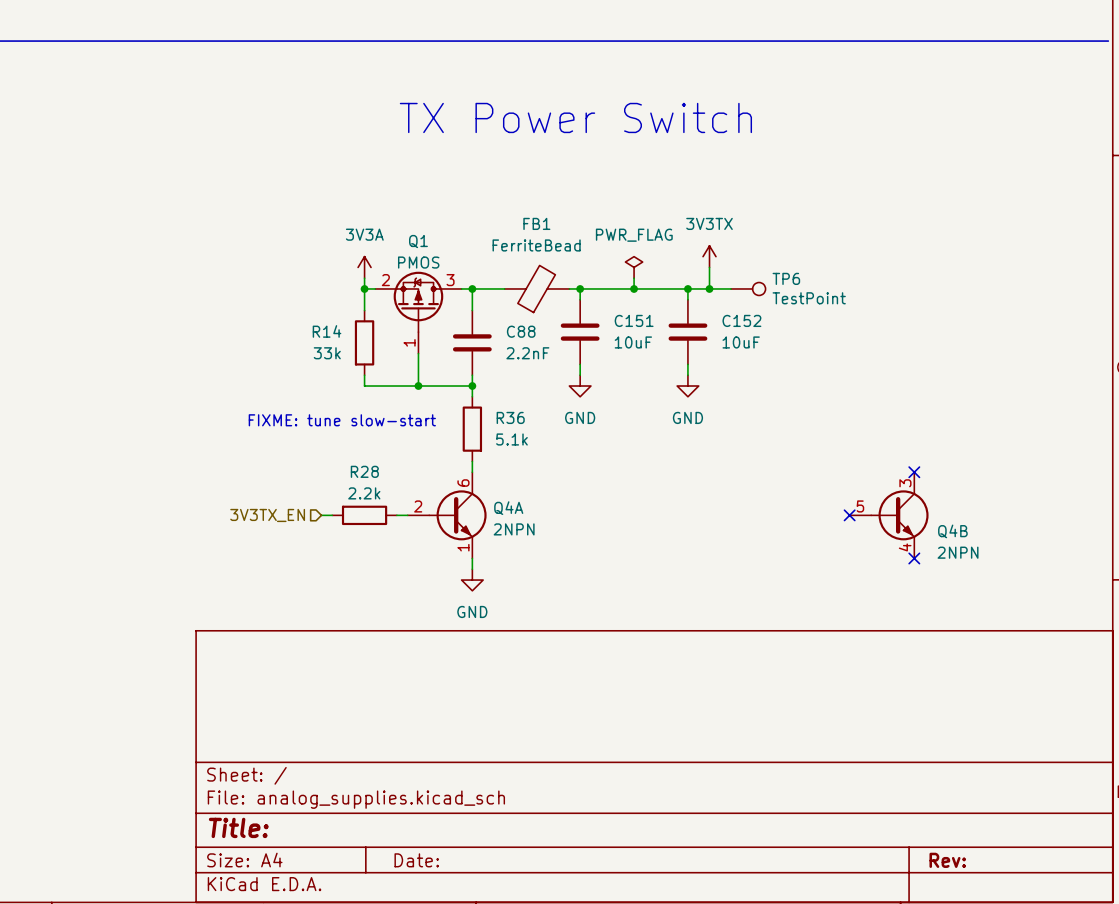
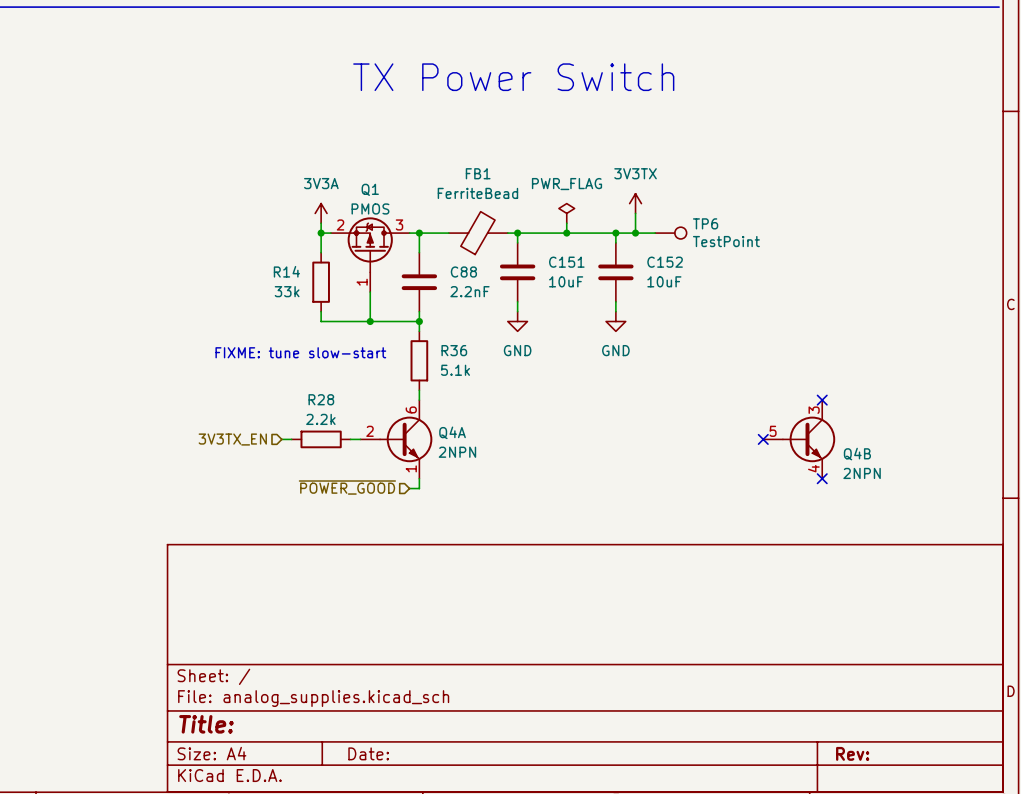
hierarchical label: none -> ~{POWER_GOOD} (347, 487)
wire: none -> (409, 488) (419, 488)
power symbol: GND (472, 580) -> none

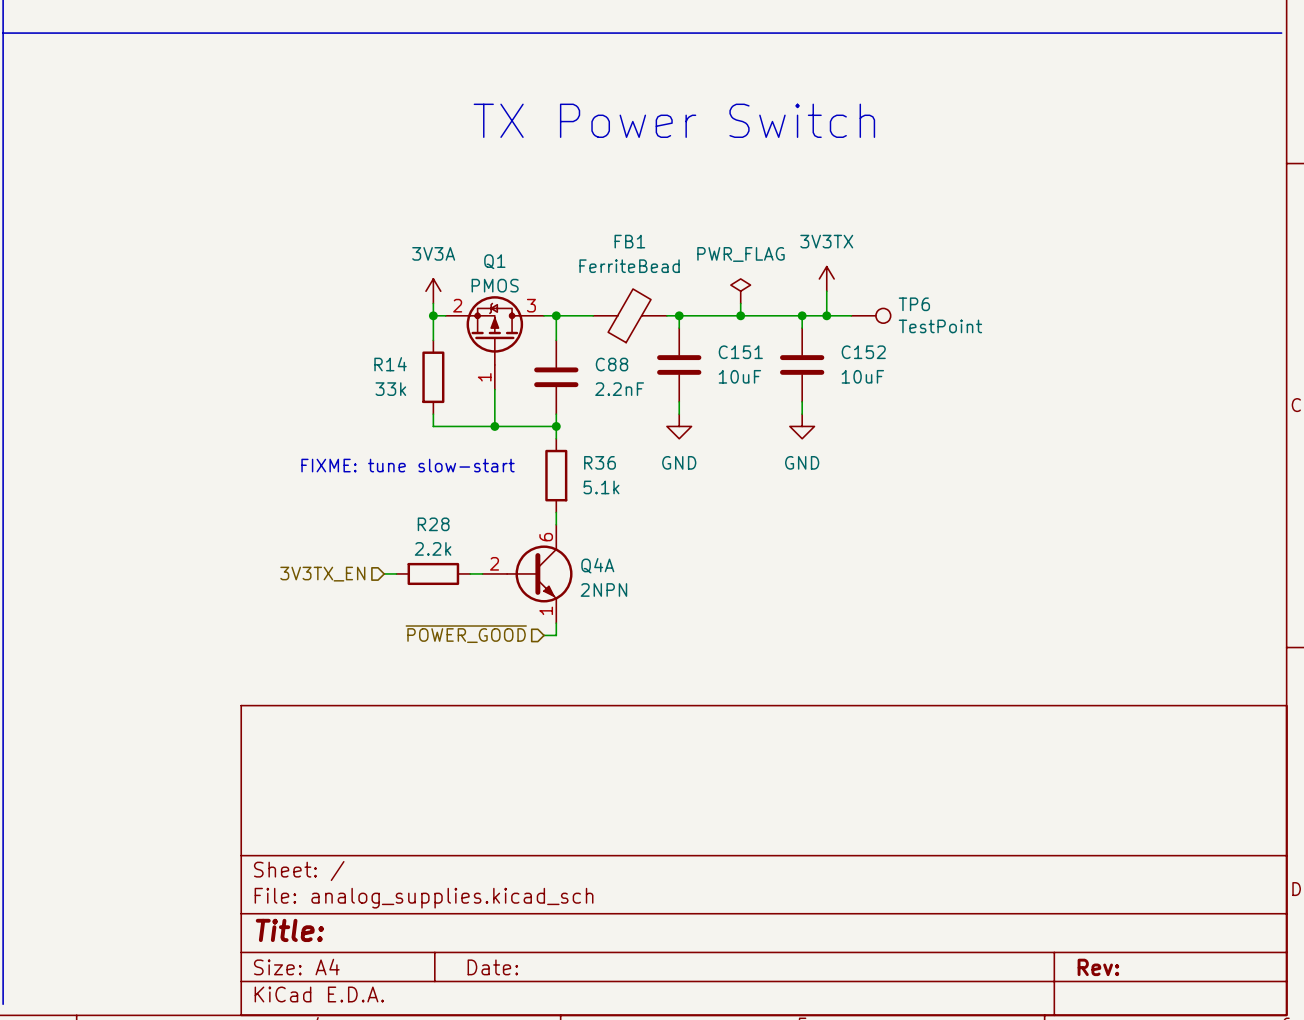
no-connect mark: (822, 400) -> none
no-connect mark: (763, 439) -> none
Q4B: 2NPN (799, 439) -> none
no-connect mark: (822, 478) -> none

